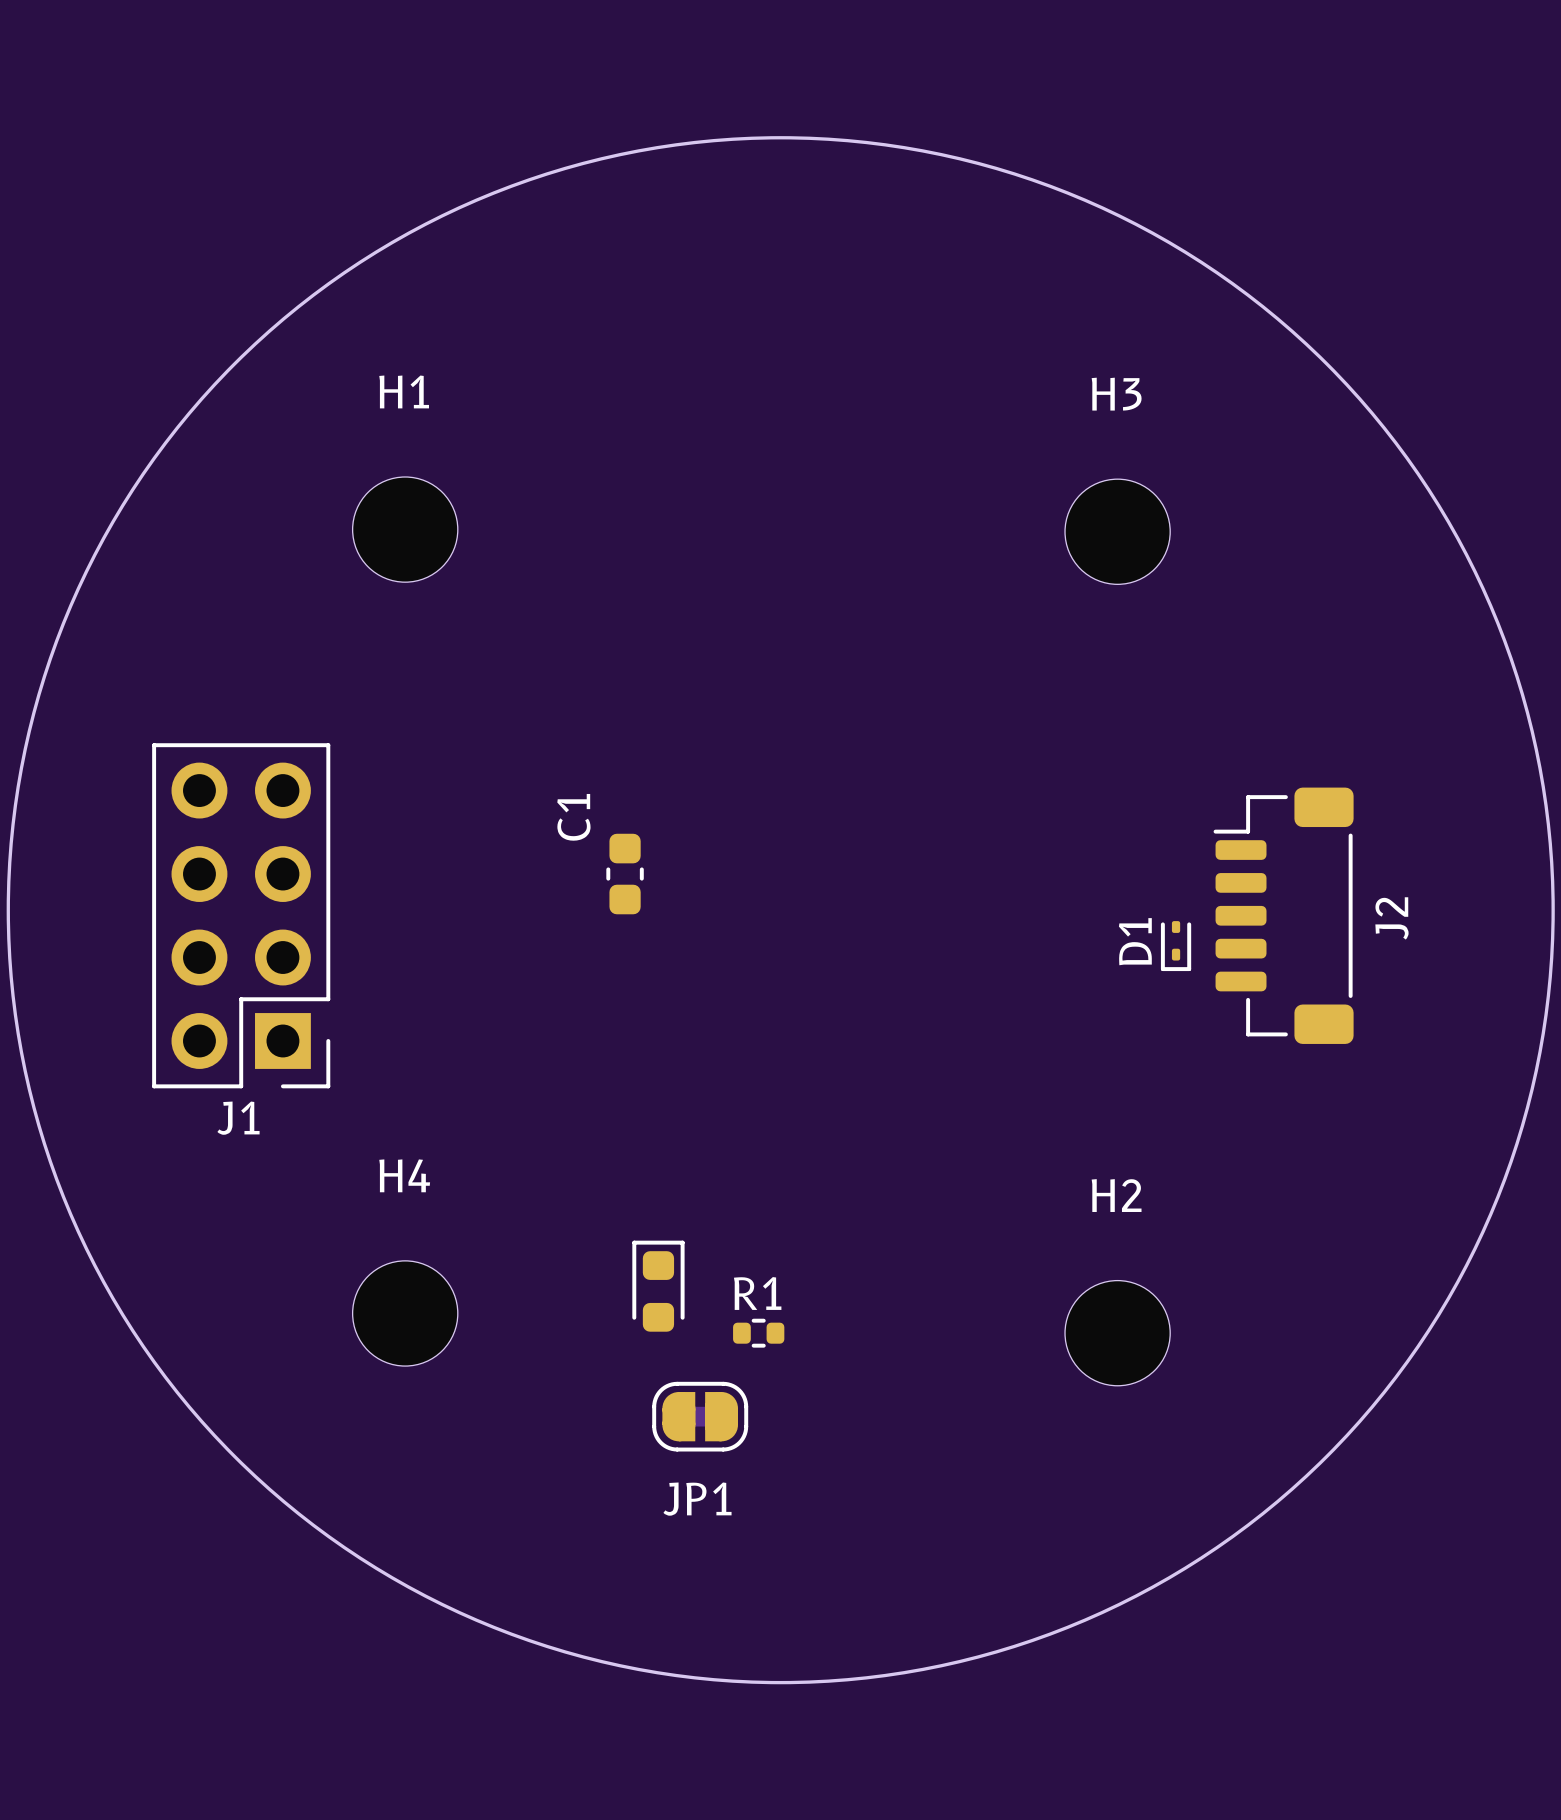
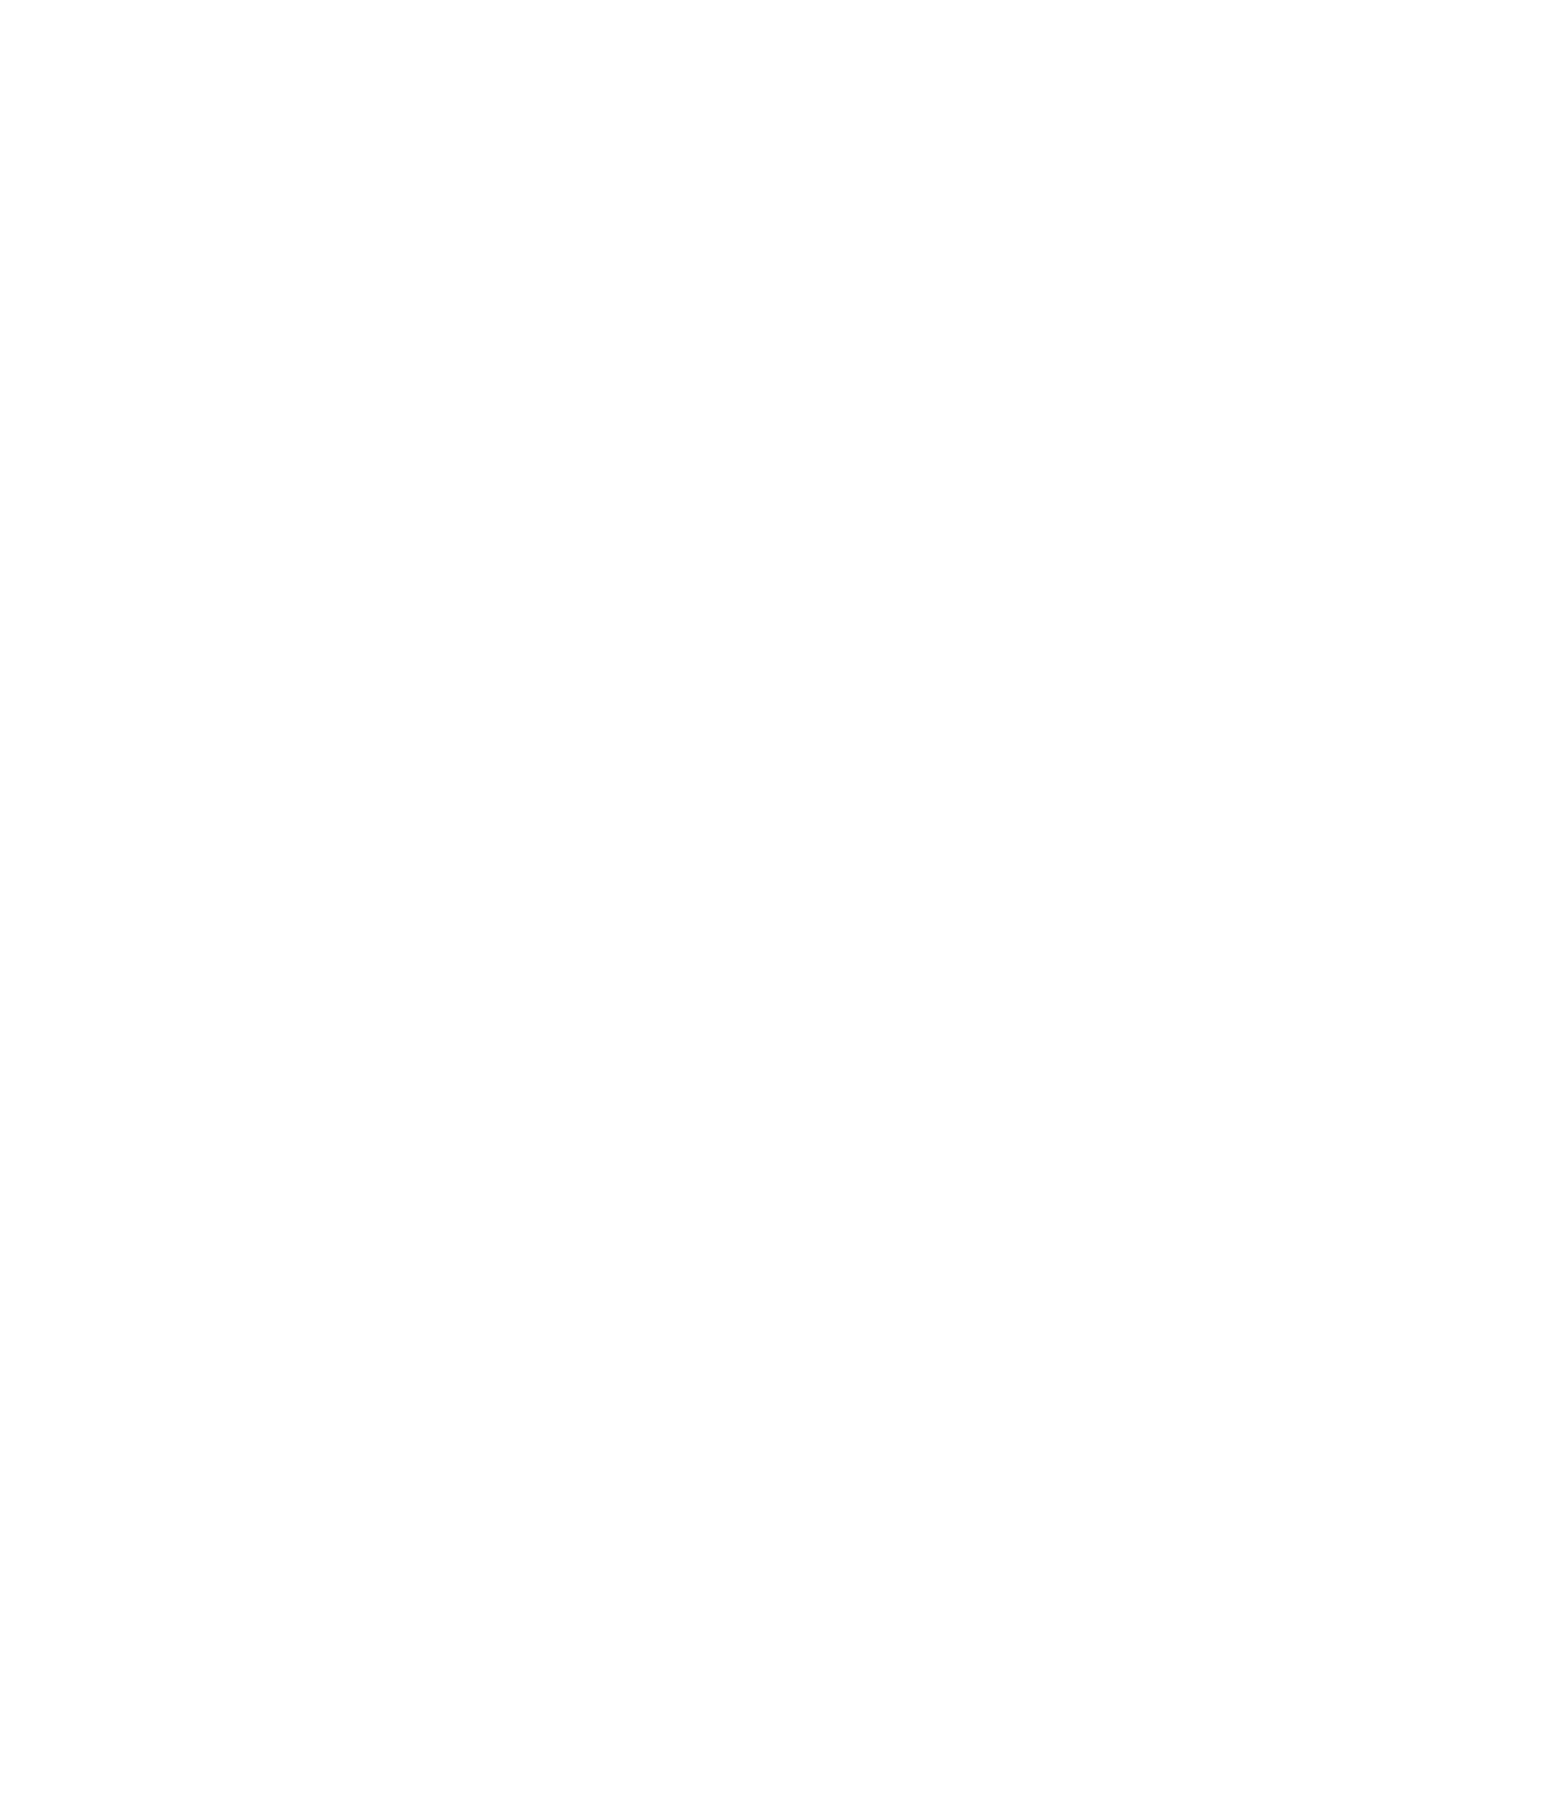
round board edge: [6, 136, 1555, 1685] -> none
H1: (405, 529) -> none
H3: (1117, 531) -> none
C1: (625, 874) -> none
J1: (241, 915) -> none
J2: (1283, 915) -> none
D1: (1176, 946) -> none
part: (658, 1286) -> none
H4: (405, 1313) -> none
R1: (758, 1333) -> none
H2: (1117, 1333) -> none
JP1: (700, 1416) -> none

